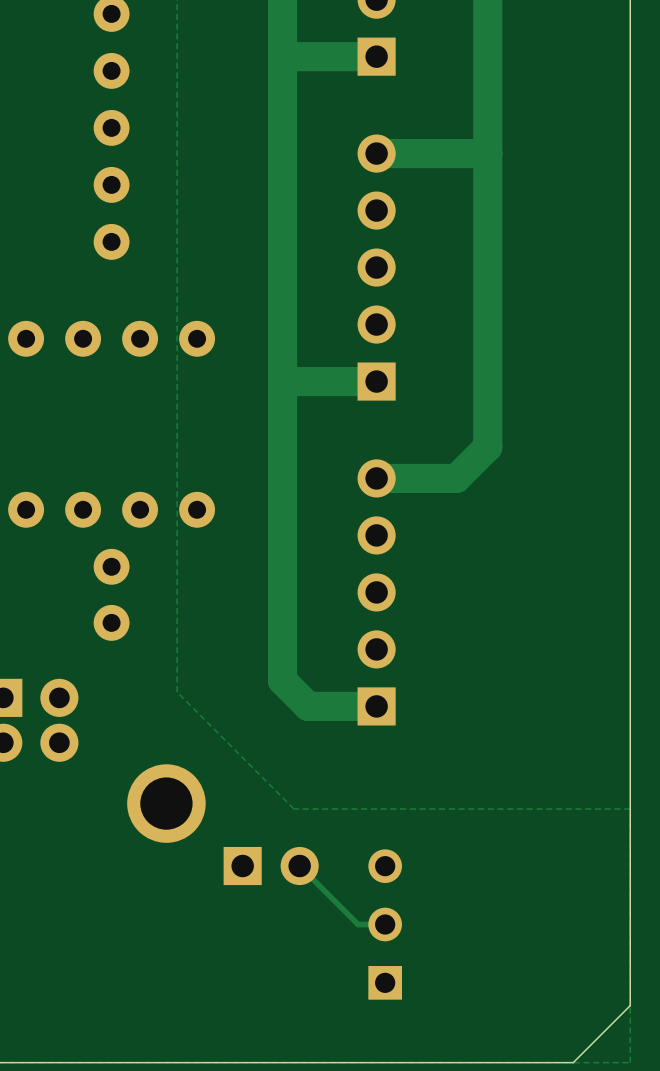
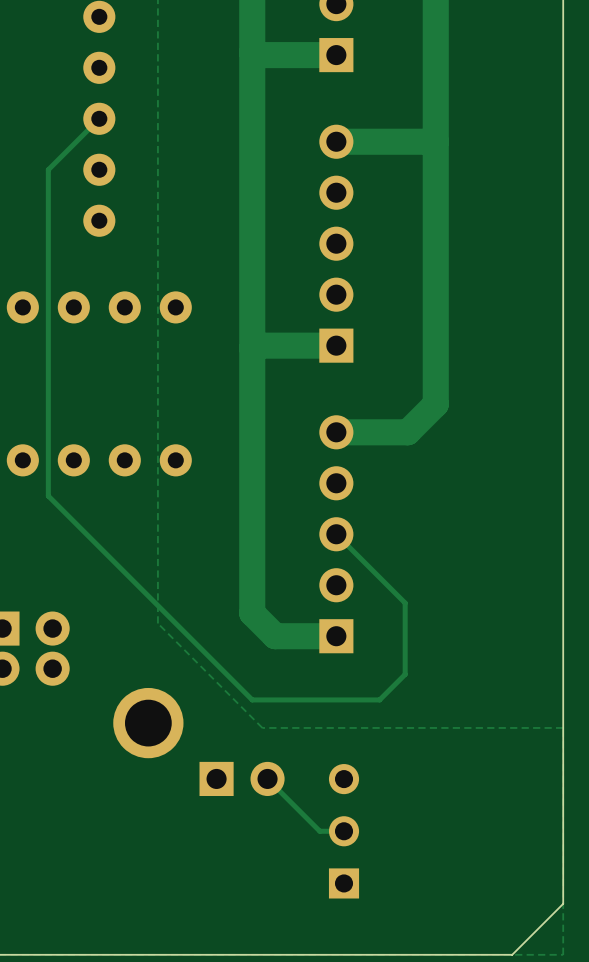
track: none -> (99, 118) (48, 169) (48, 496) (252, 699) (379, 699) (405, 674) (405, 603) (336, 534)
part: (111, 594) -> none

